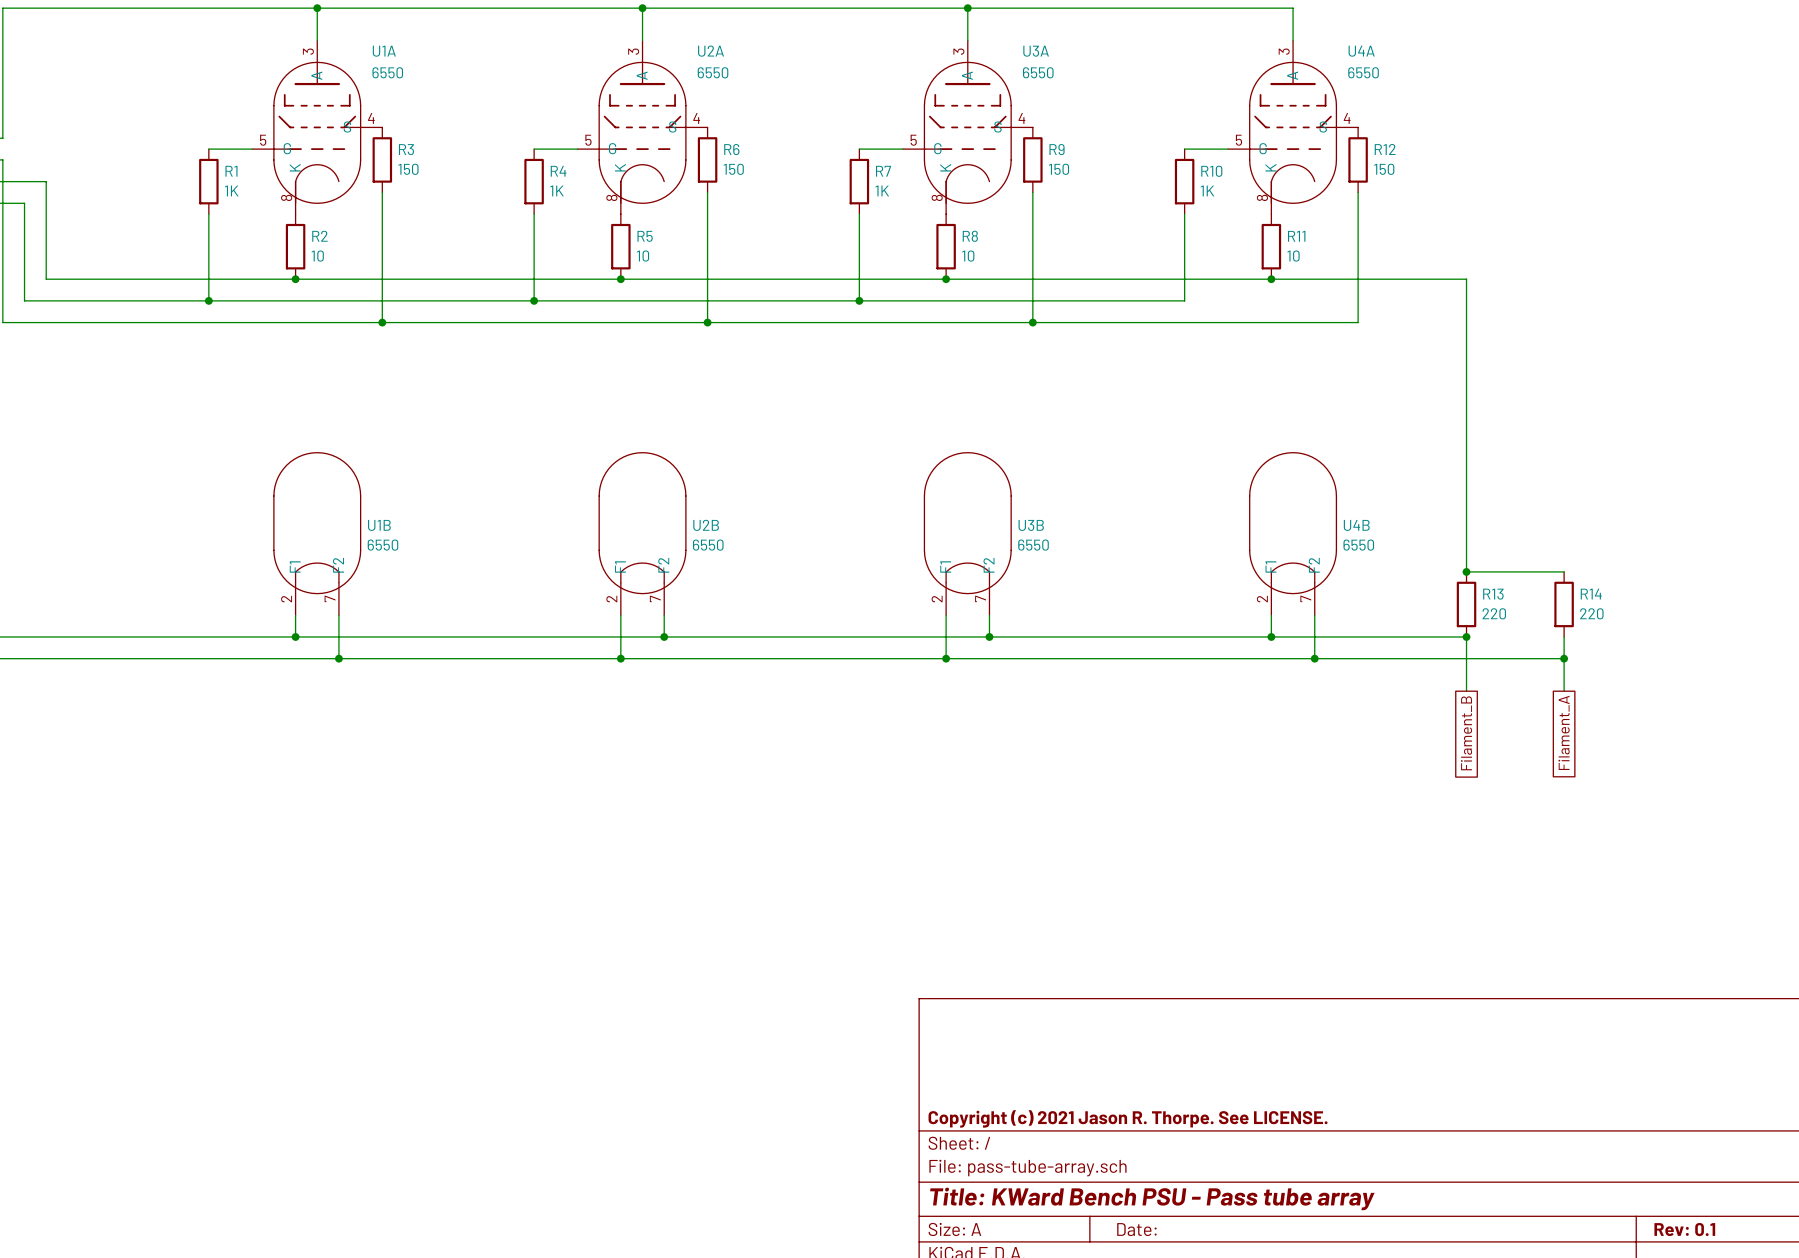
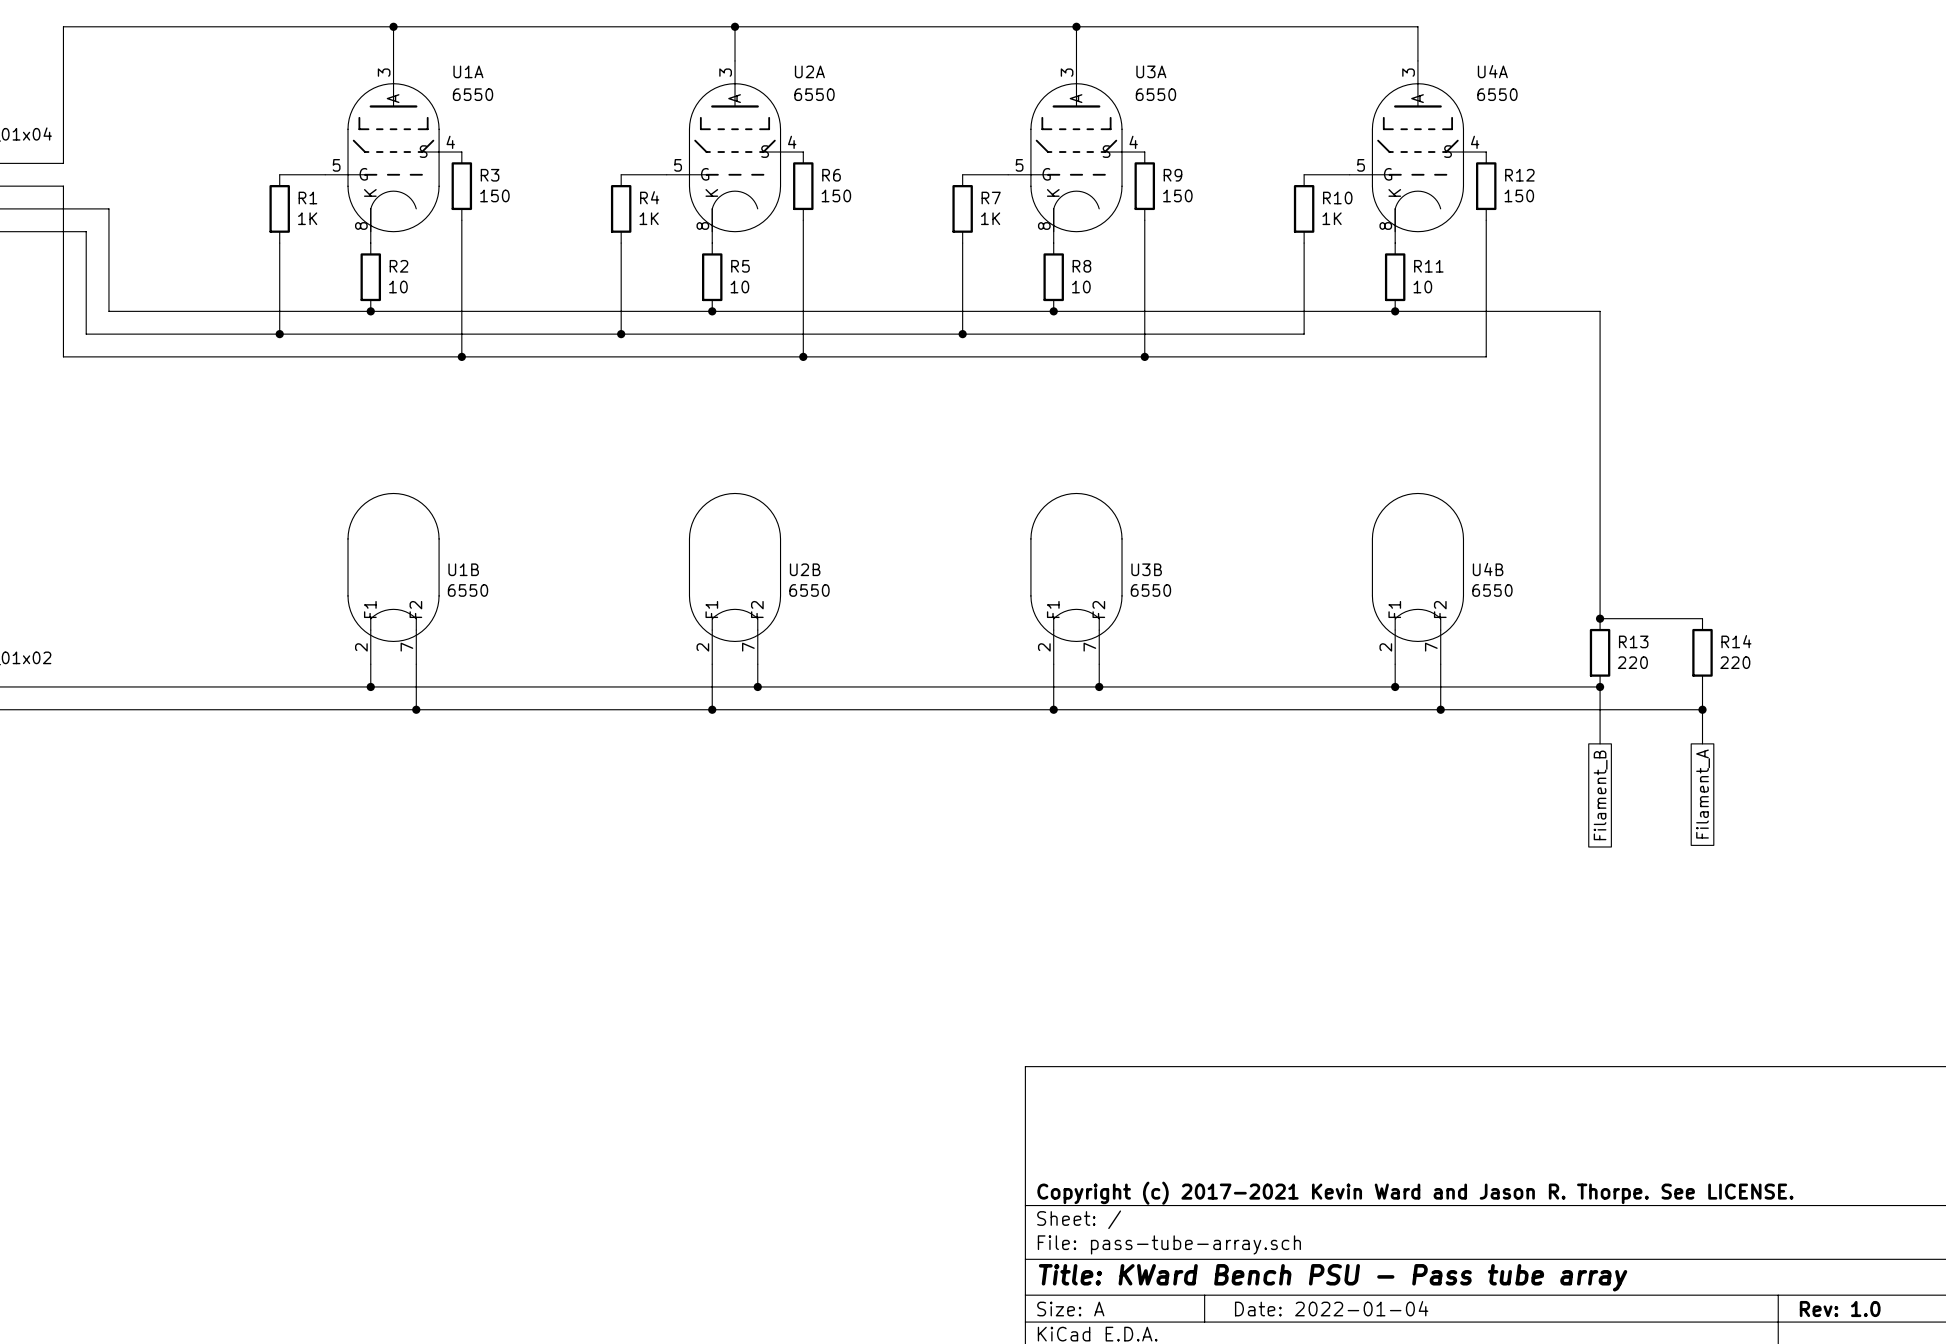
title block: Copyright (c) 2021 Jason R. Thorpe. See LICENSE. (1128, 1118) -> Copyright (c) 2017-2021 Kevin Ward and Jason R. Thorpe. See LICENSE. (1415, 1193)
title block: Date: (1136, 1229) -> Date: 2022-01-04 (1331, 1308)
title block: Rev: 0.1 (1684, 1229) -> Rev: 1.0 (1840, 1309)

